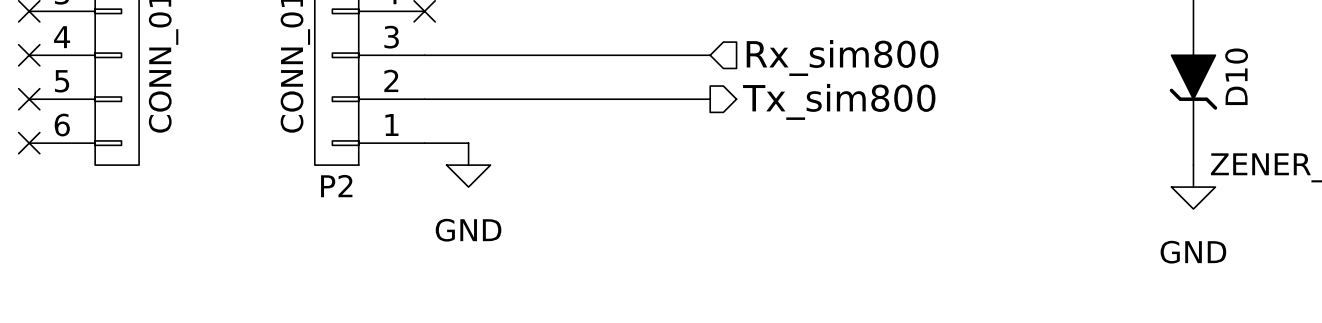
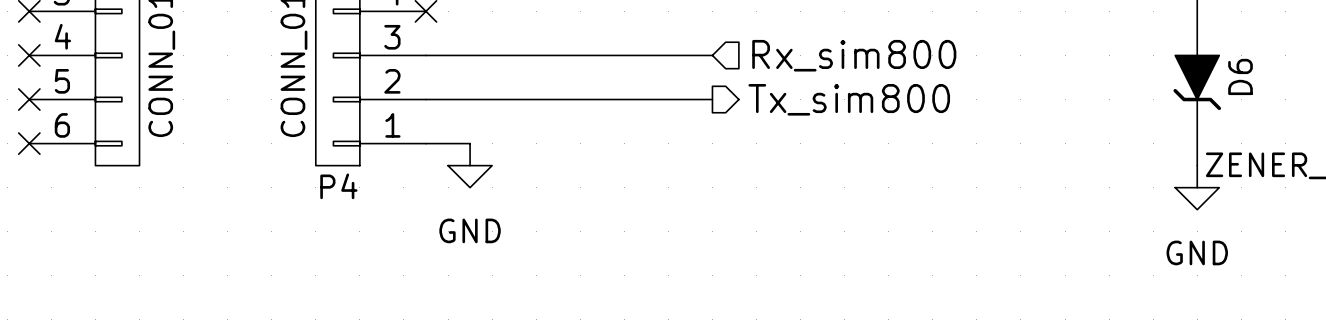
D10 name: D10 (1236, 76) -> D6 (1240, 76)
P2 name: P2 (336, 186) -> P4 (338, 186)

